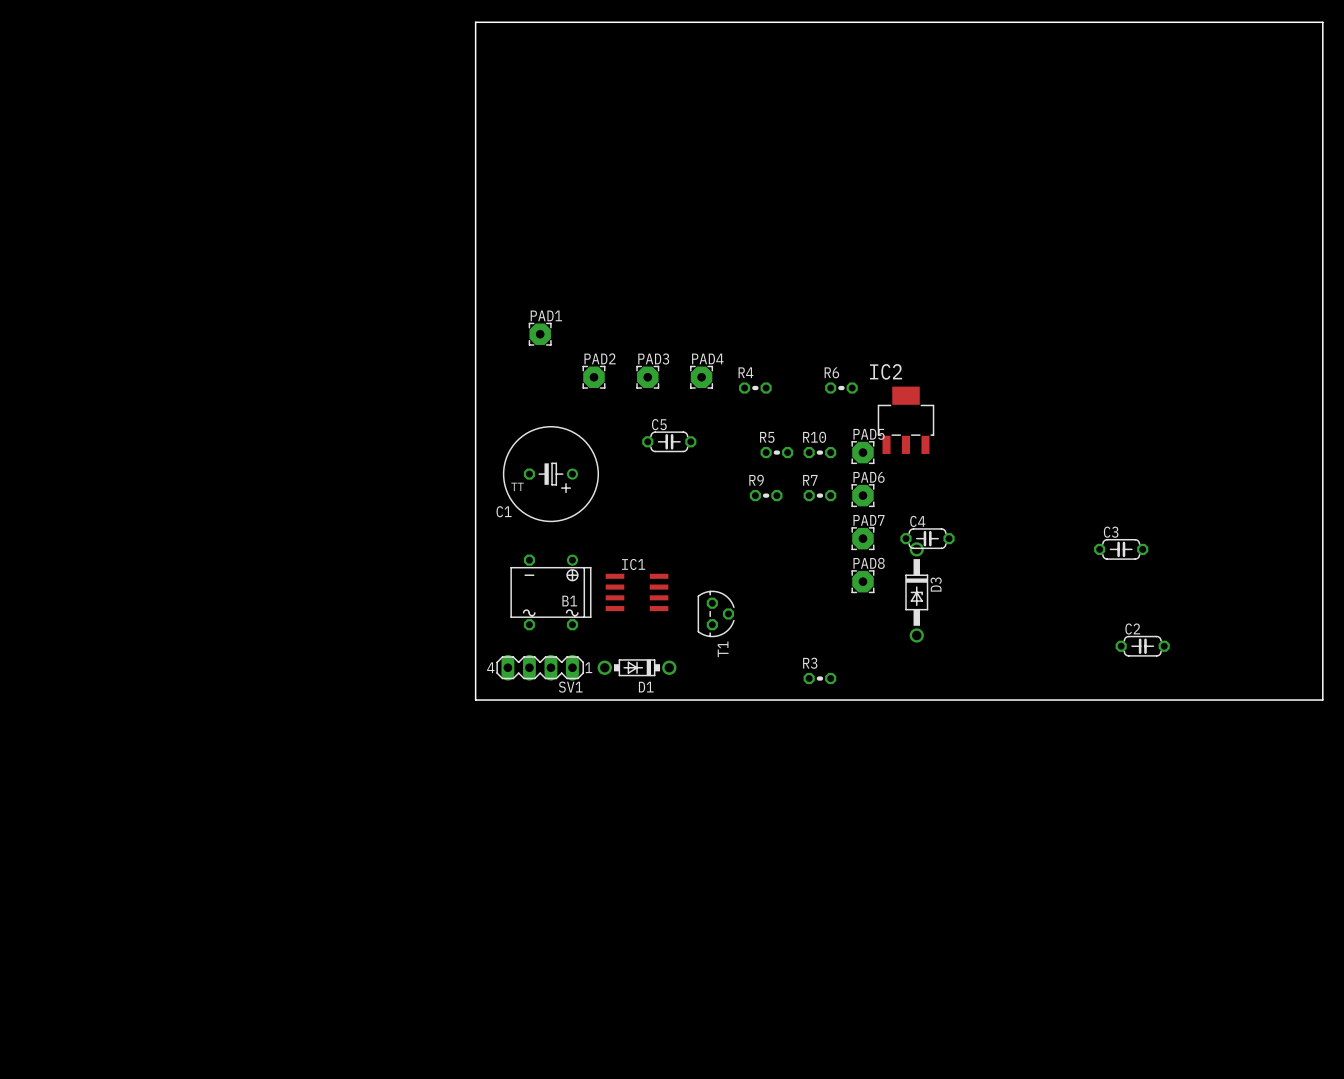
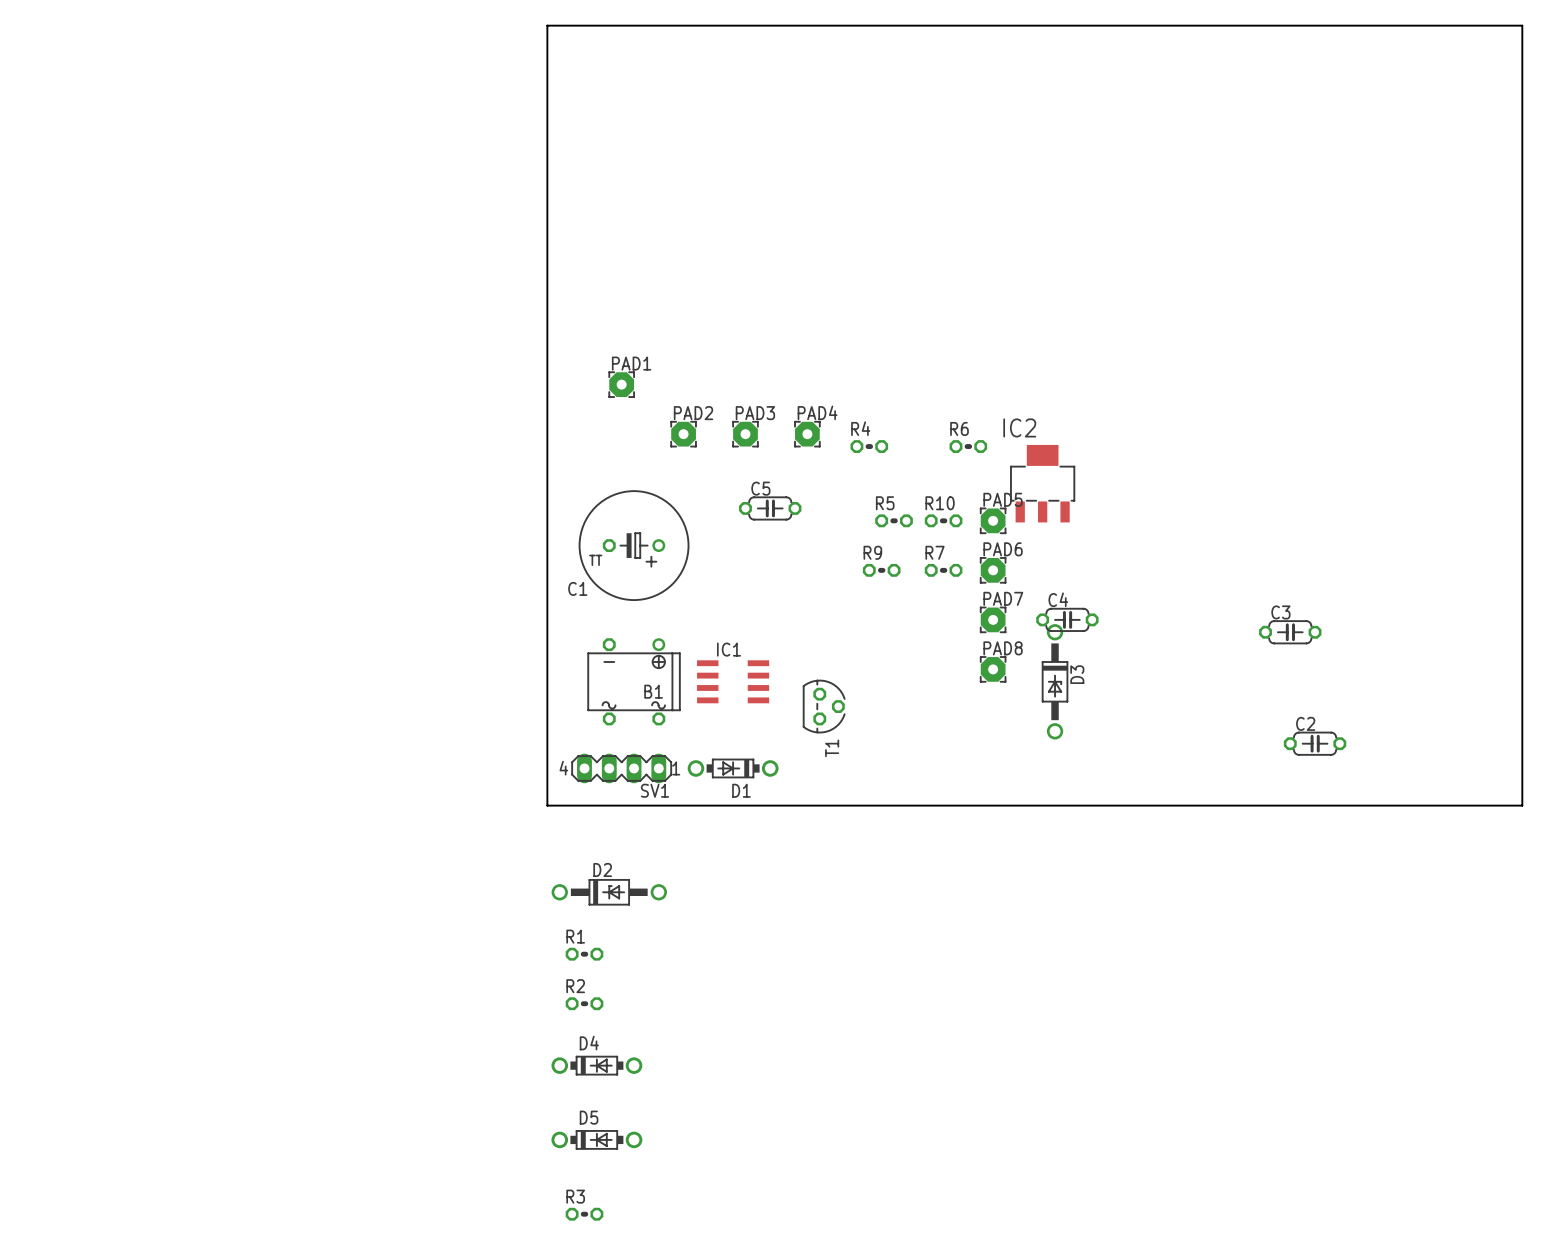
R3 position: (819, 678) -> (584, 1214)
D2: none -> (609, 892)
R1: none -> (584, 954)
R2: none -> (584, 1003)
D4: none -> (596, 1065)
D5: none -> (596, 1139)

